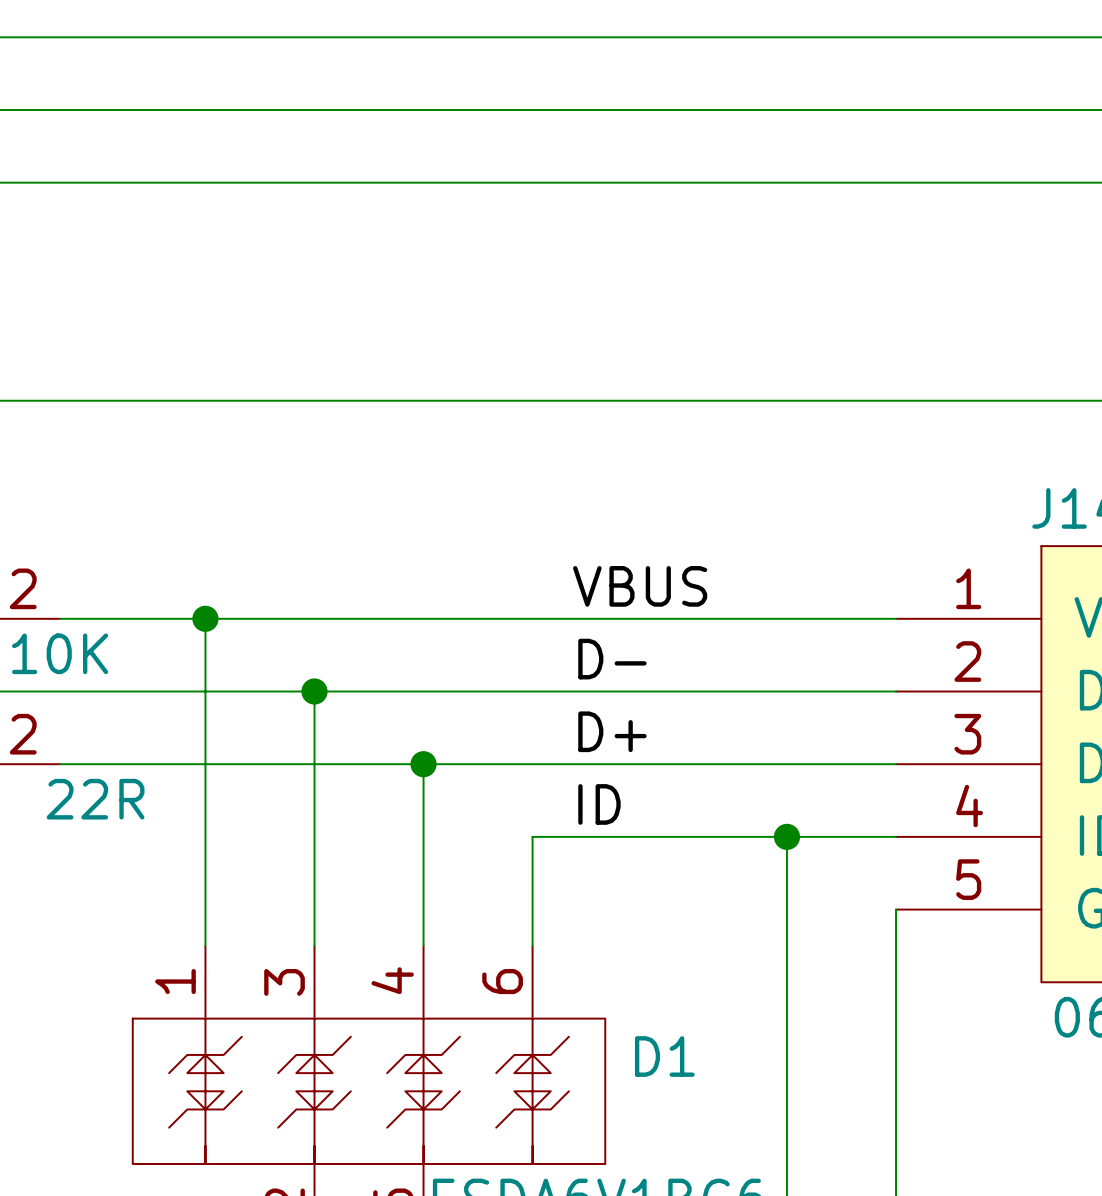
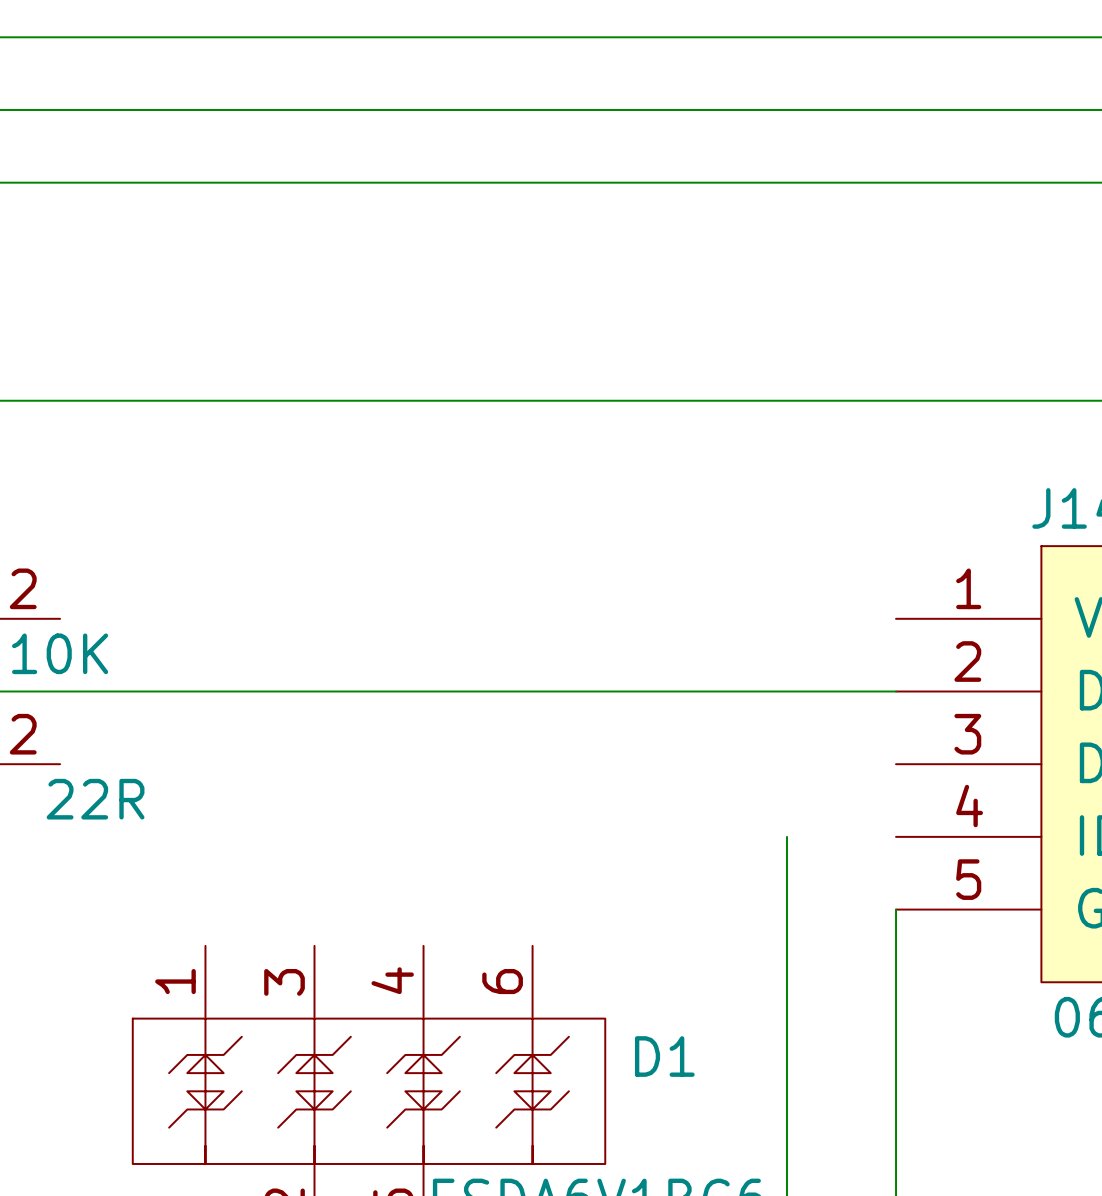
label: VBUS (640, 586) -> none
wire: (60, 618) (896, 618) -> none
wire: (205, 618) (205, 945) -> none
junction: (205, 618) -> none
label: D- (612, 659) -> none
wire: (314, 691) (314, 945) -> none
junction: (314, 691) -> none
label: D+ (612, 731) -> none
wire: (60, 764) (896, 764) -> none
wire: (423, 764) (423, 945) -> none
junction: (423, 764) -> none
label: ID (599, 804) -> none
junction: (786, 836) -> none
wire: (896, 836) (532, 836) (532, 945) -> none

